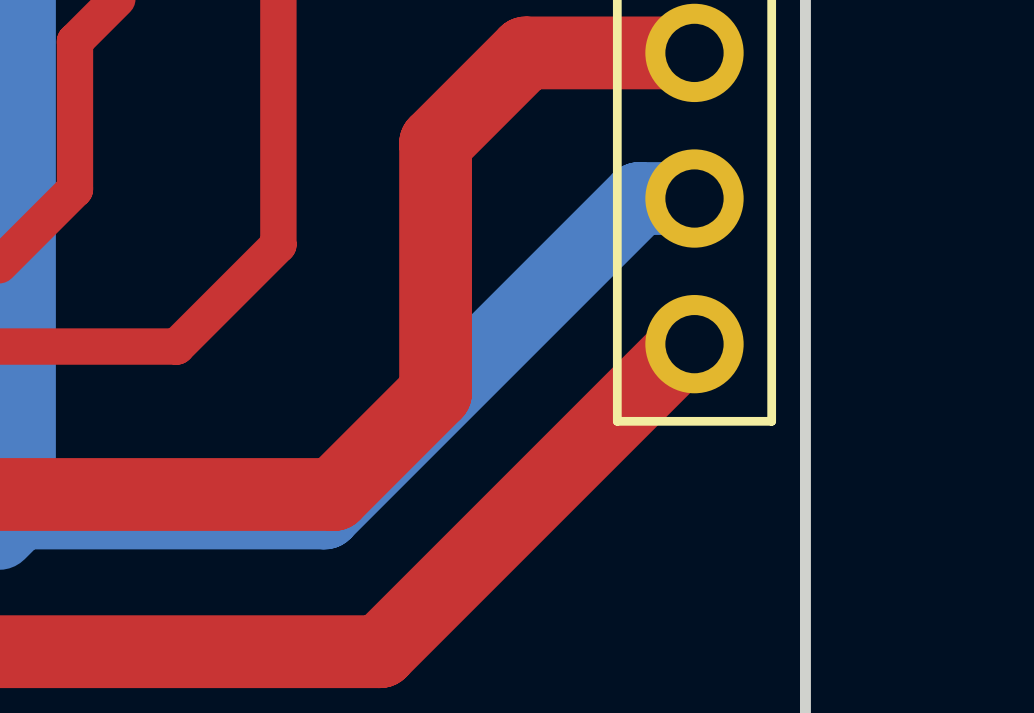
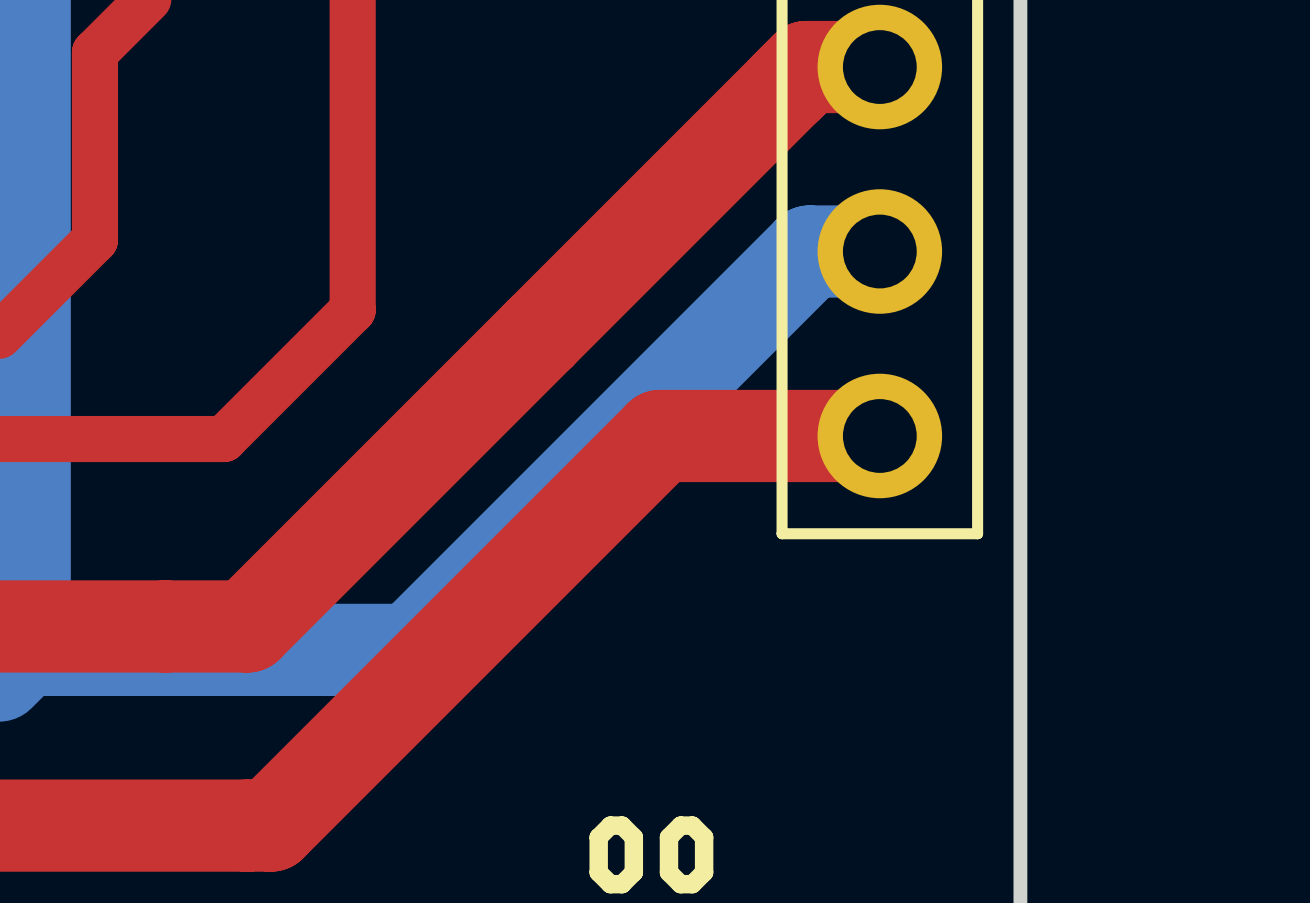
top track: (636, 52) (525, 52) (435, 143) (435, 392) (333, 494) (195, 494) -> (806, 67) (247, 626)
top track: (687, 344) (380, 651) (213, 651) -> (871, 435) (660, 435) (270, 825)
line: none -> (610, 825) (622, 825) (633, 837) (633, 872) (622, 884) (610, 884) (598, 872) (598, 837) (610, 825)
line: none -> (680, 825) (668, 837) (668, 872) (680, 884) (692, 884) (704, 872) (704, 837) (692, 825) (680, 825)

